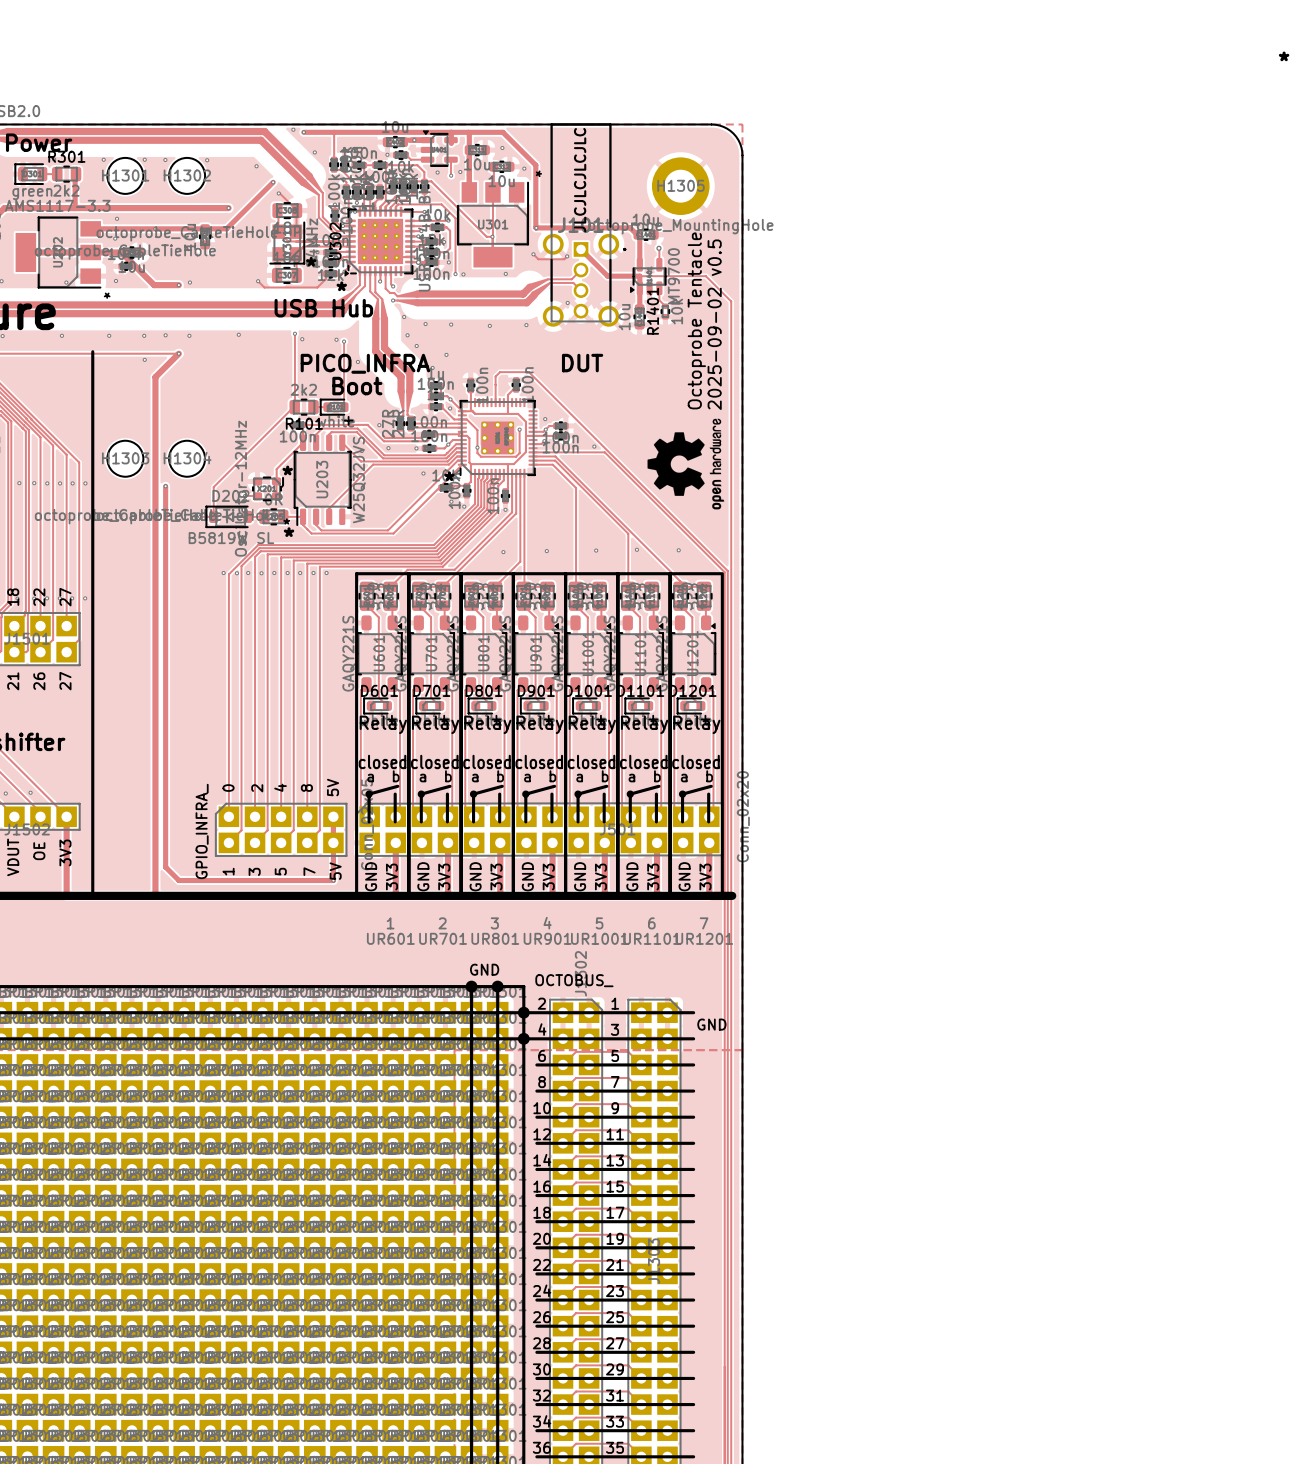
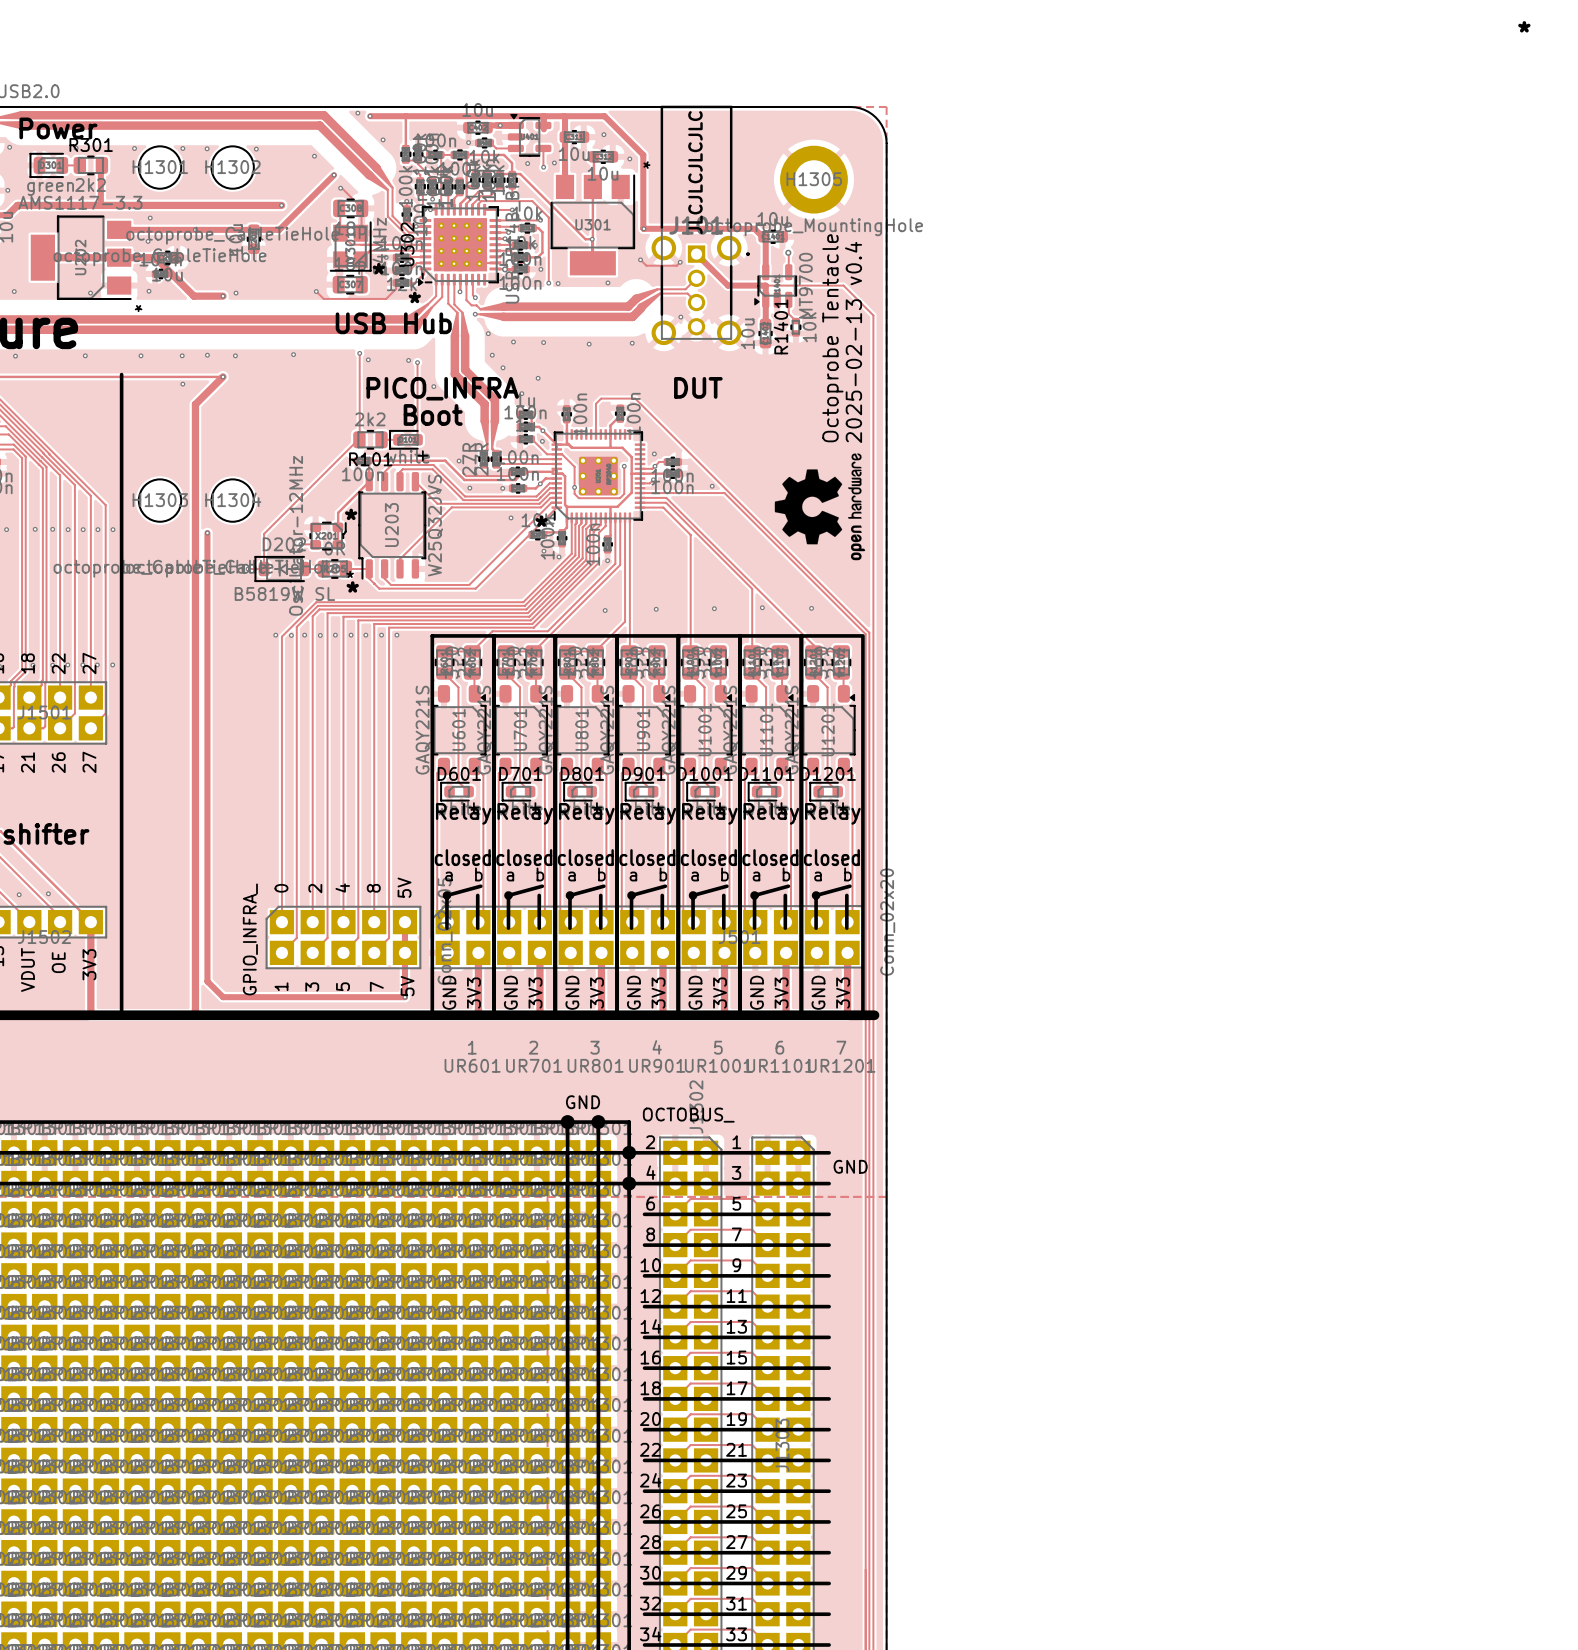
text: 2025-09-02 v0.5 (714, 324) -> 2025-02-13 v0.4 (853, 342)

